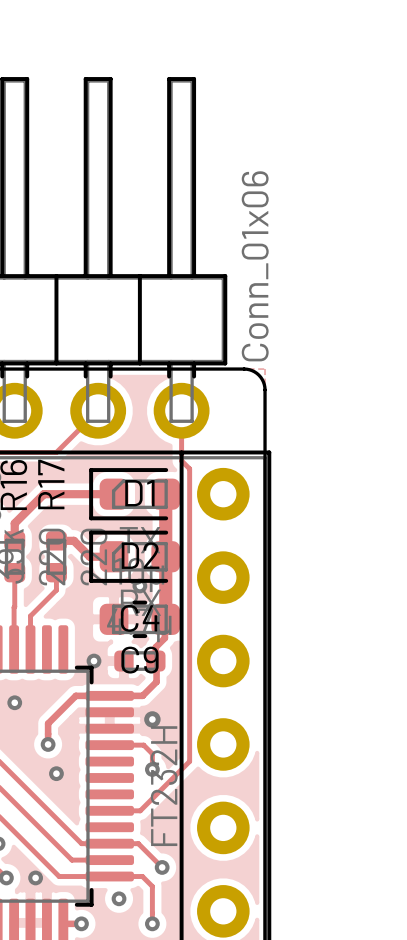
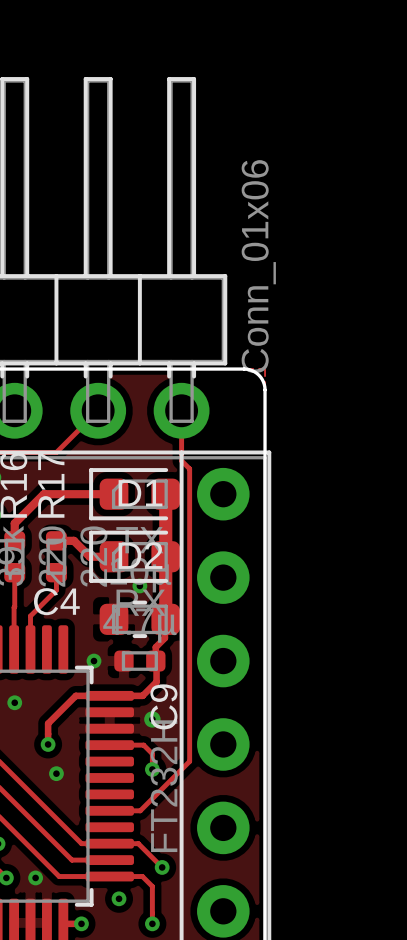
C4 name position: C4 (140, 618) -> C4 (56, 601)
C9 name rotation: 0° (140, 660) -> 90° counterclockwise (163, 706)

